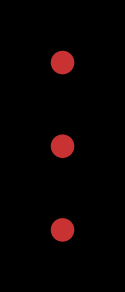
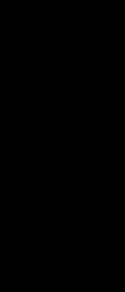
part: (62, 62) -> none
part: (62, 146) -> none
part: (62, 229) -> none

